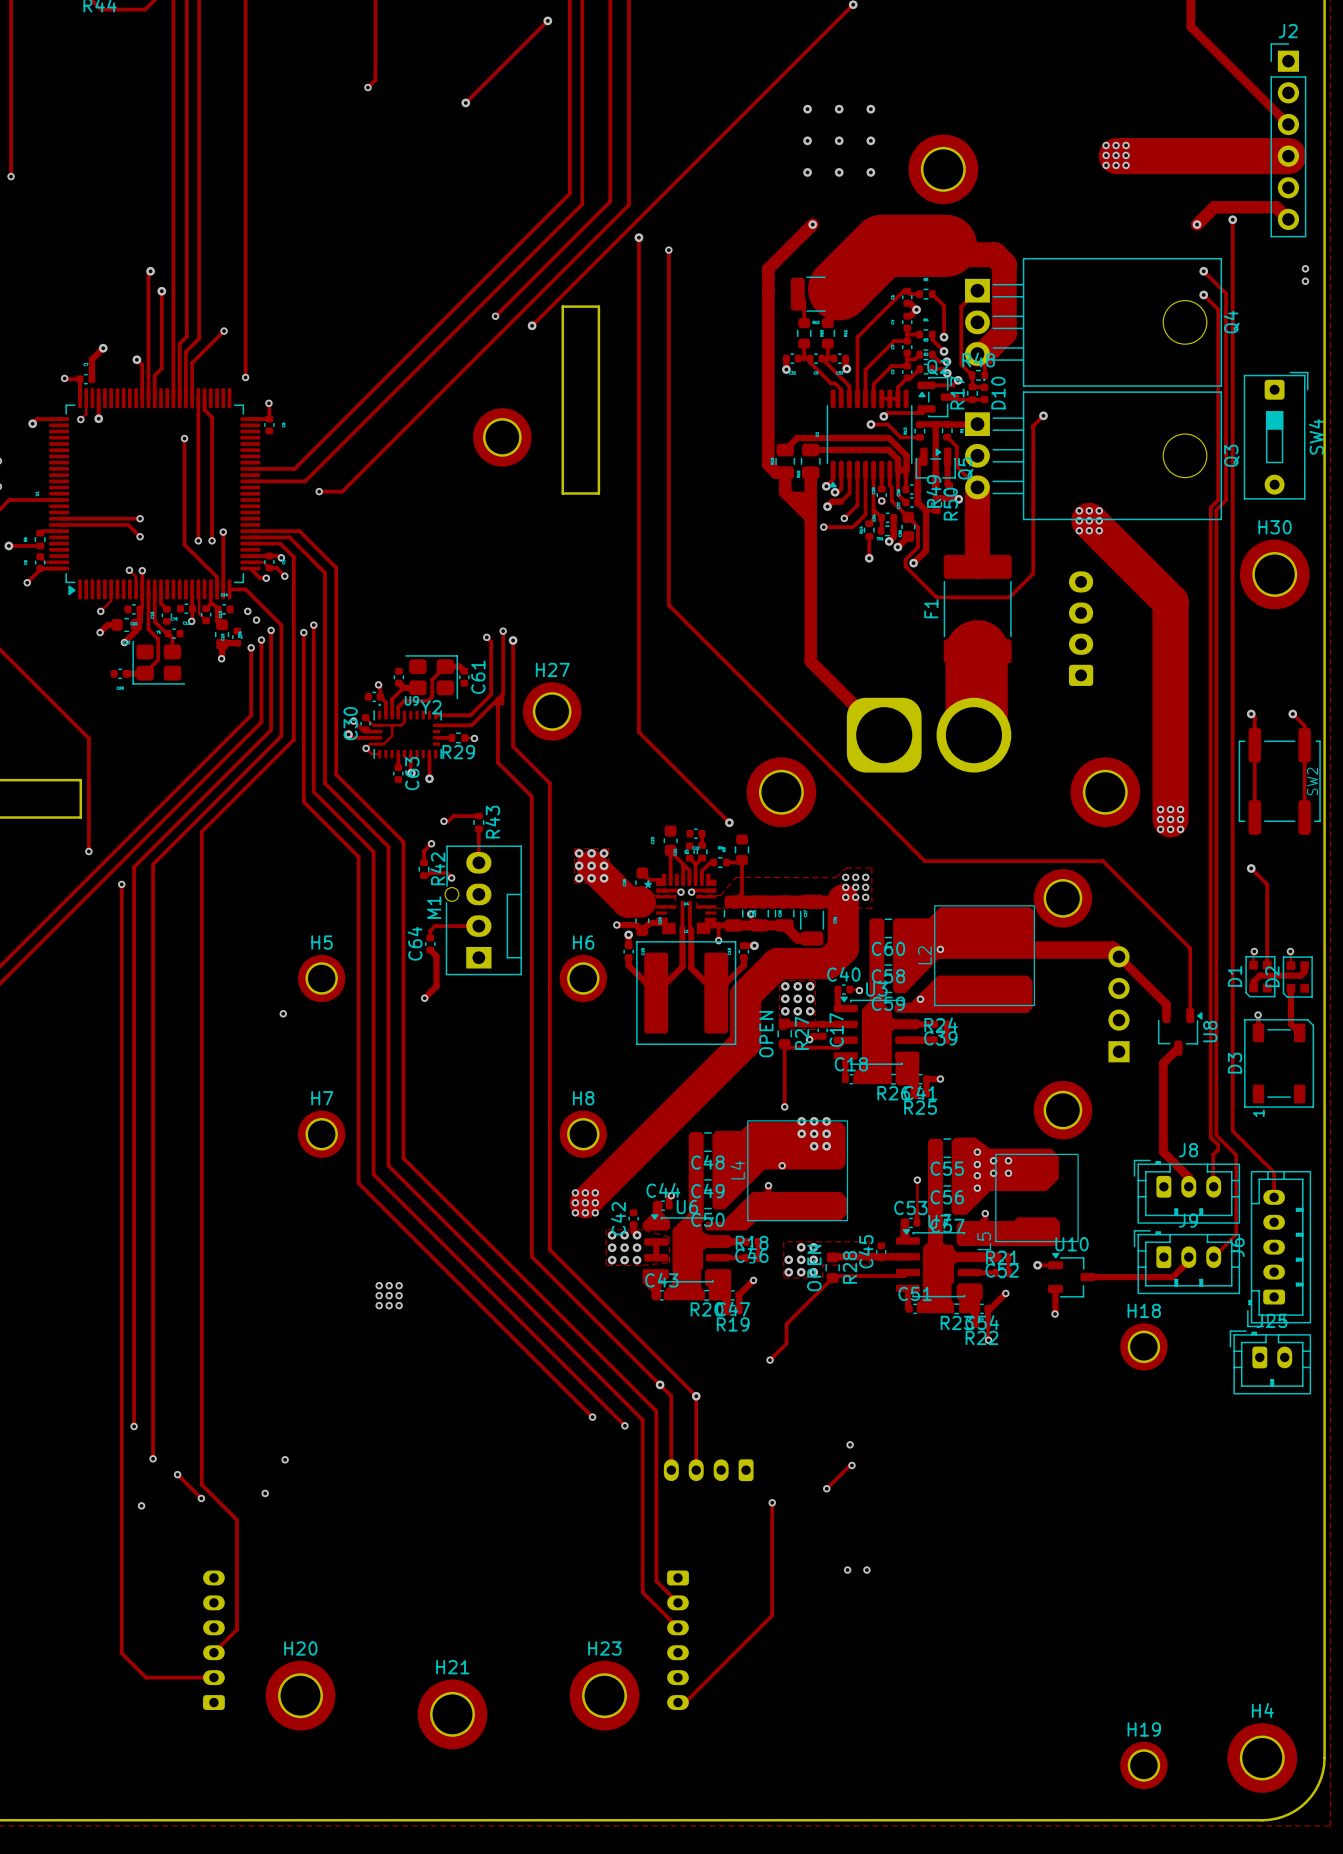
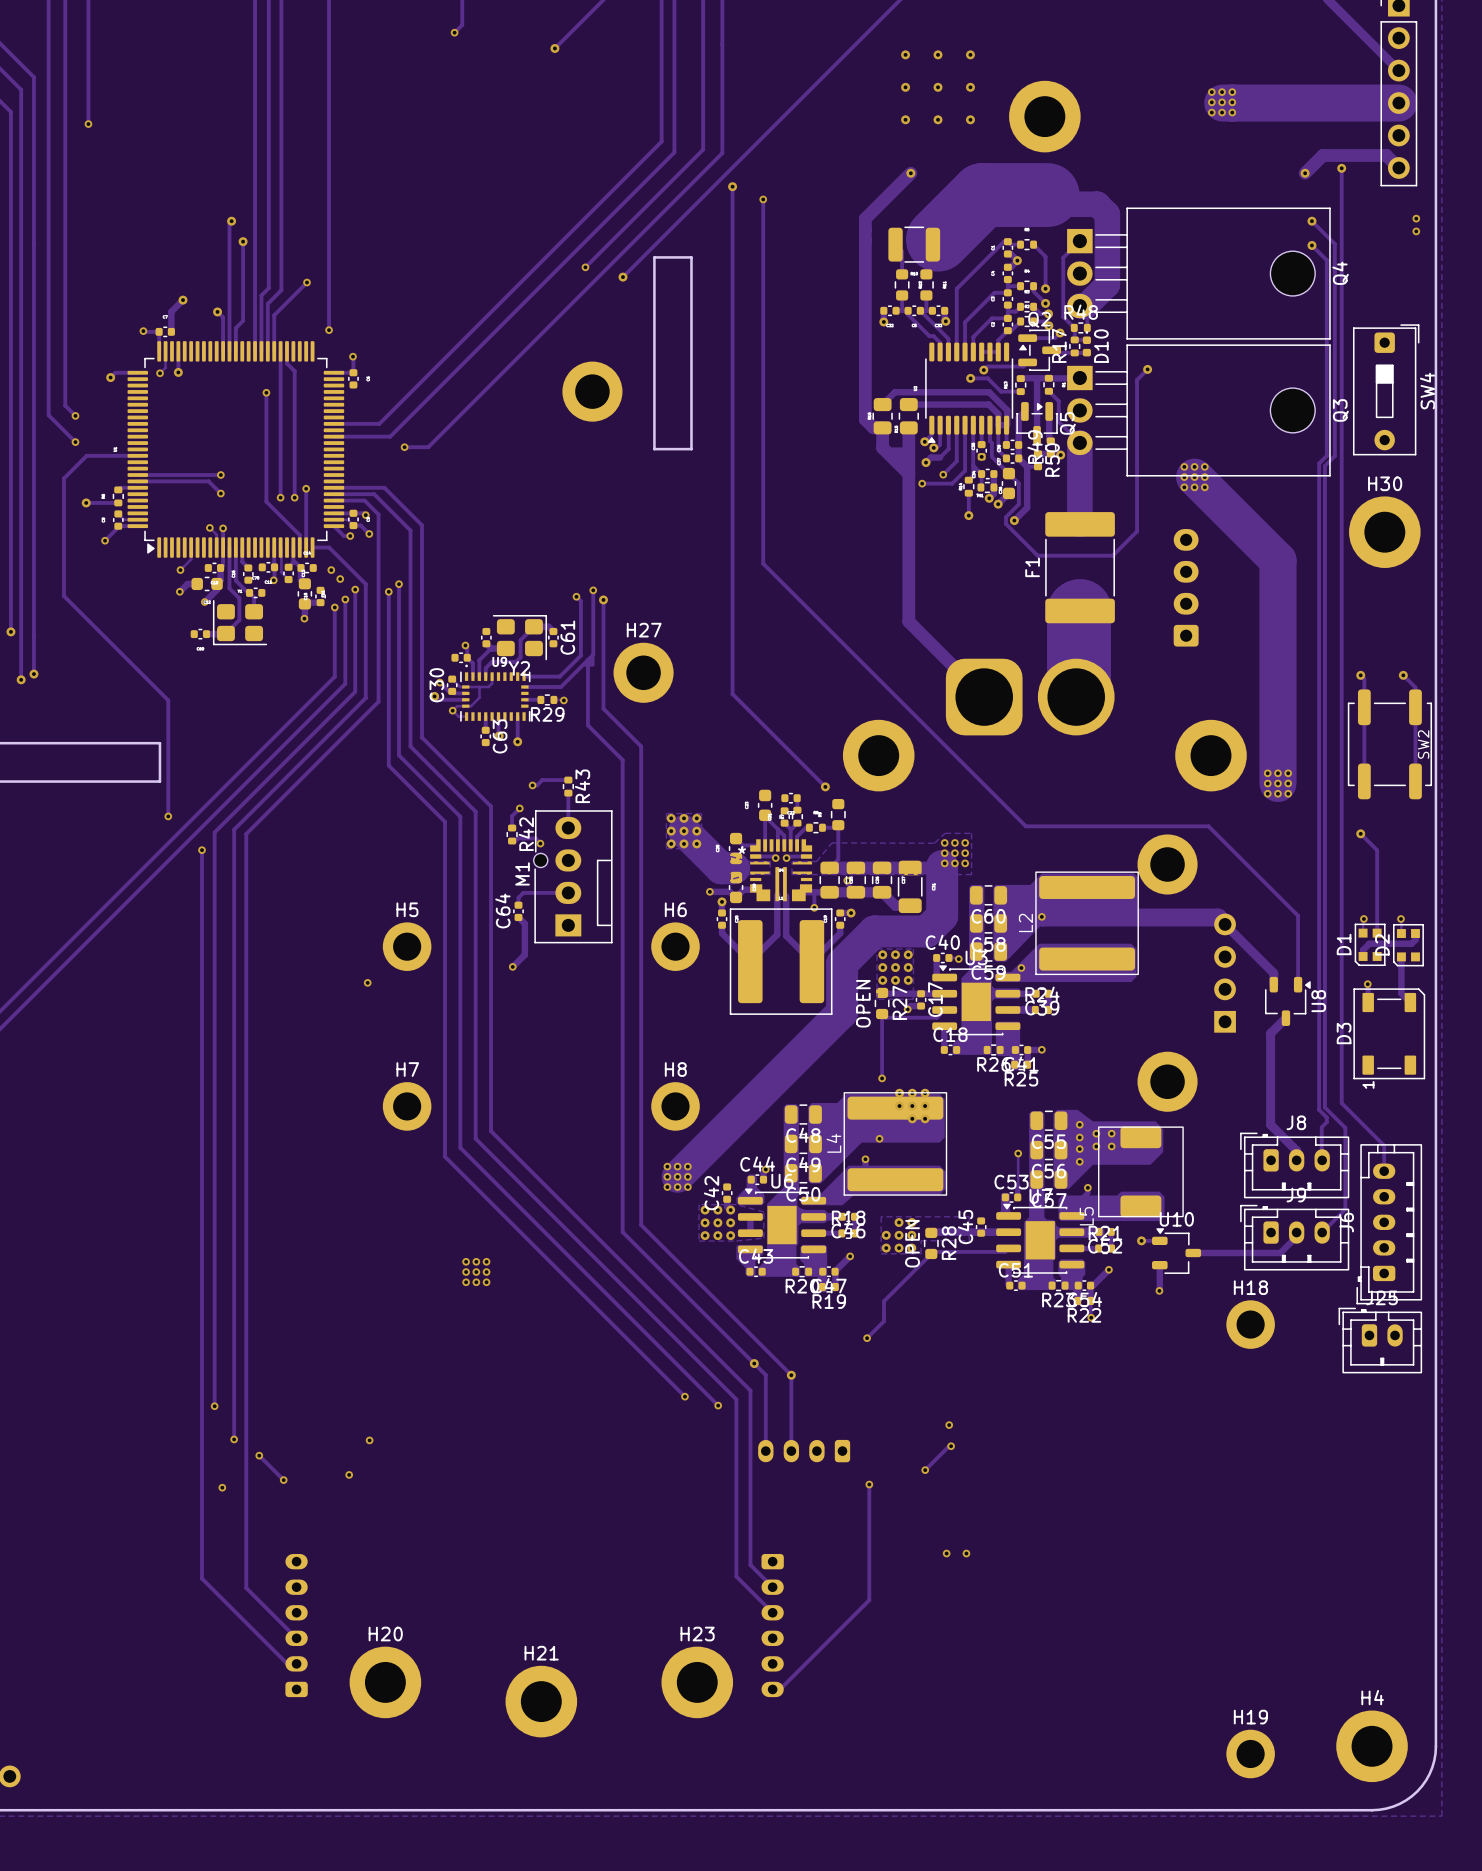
track: (201, 831) (201, 1484) (236, 1519) (236, 1629) (213, 1652) -> (284, 796) (246, 834) (246, 1588) (296, 1638)
track: (121, 1594) (121, 1653) (146, 1677) (204, 1677) -> (202, 1578) (287, 1663)

